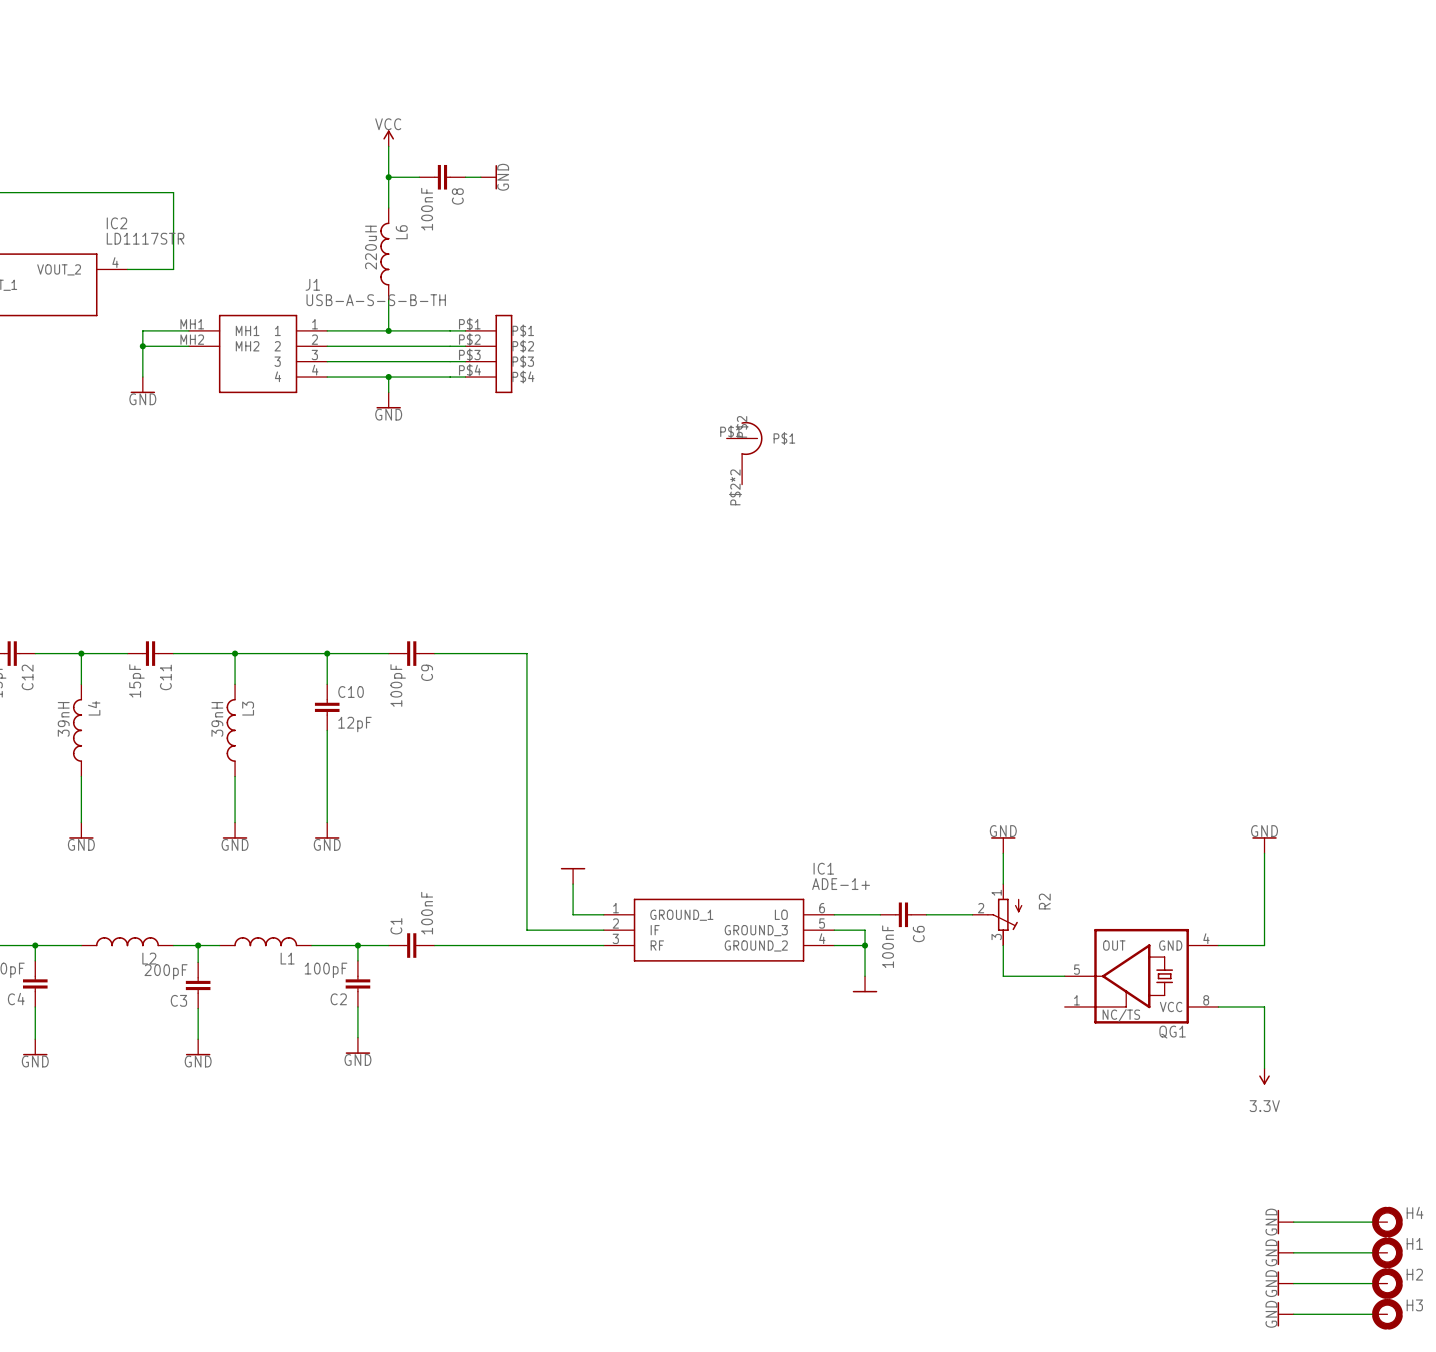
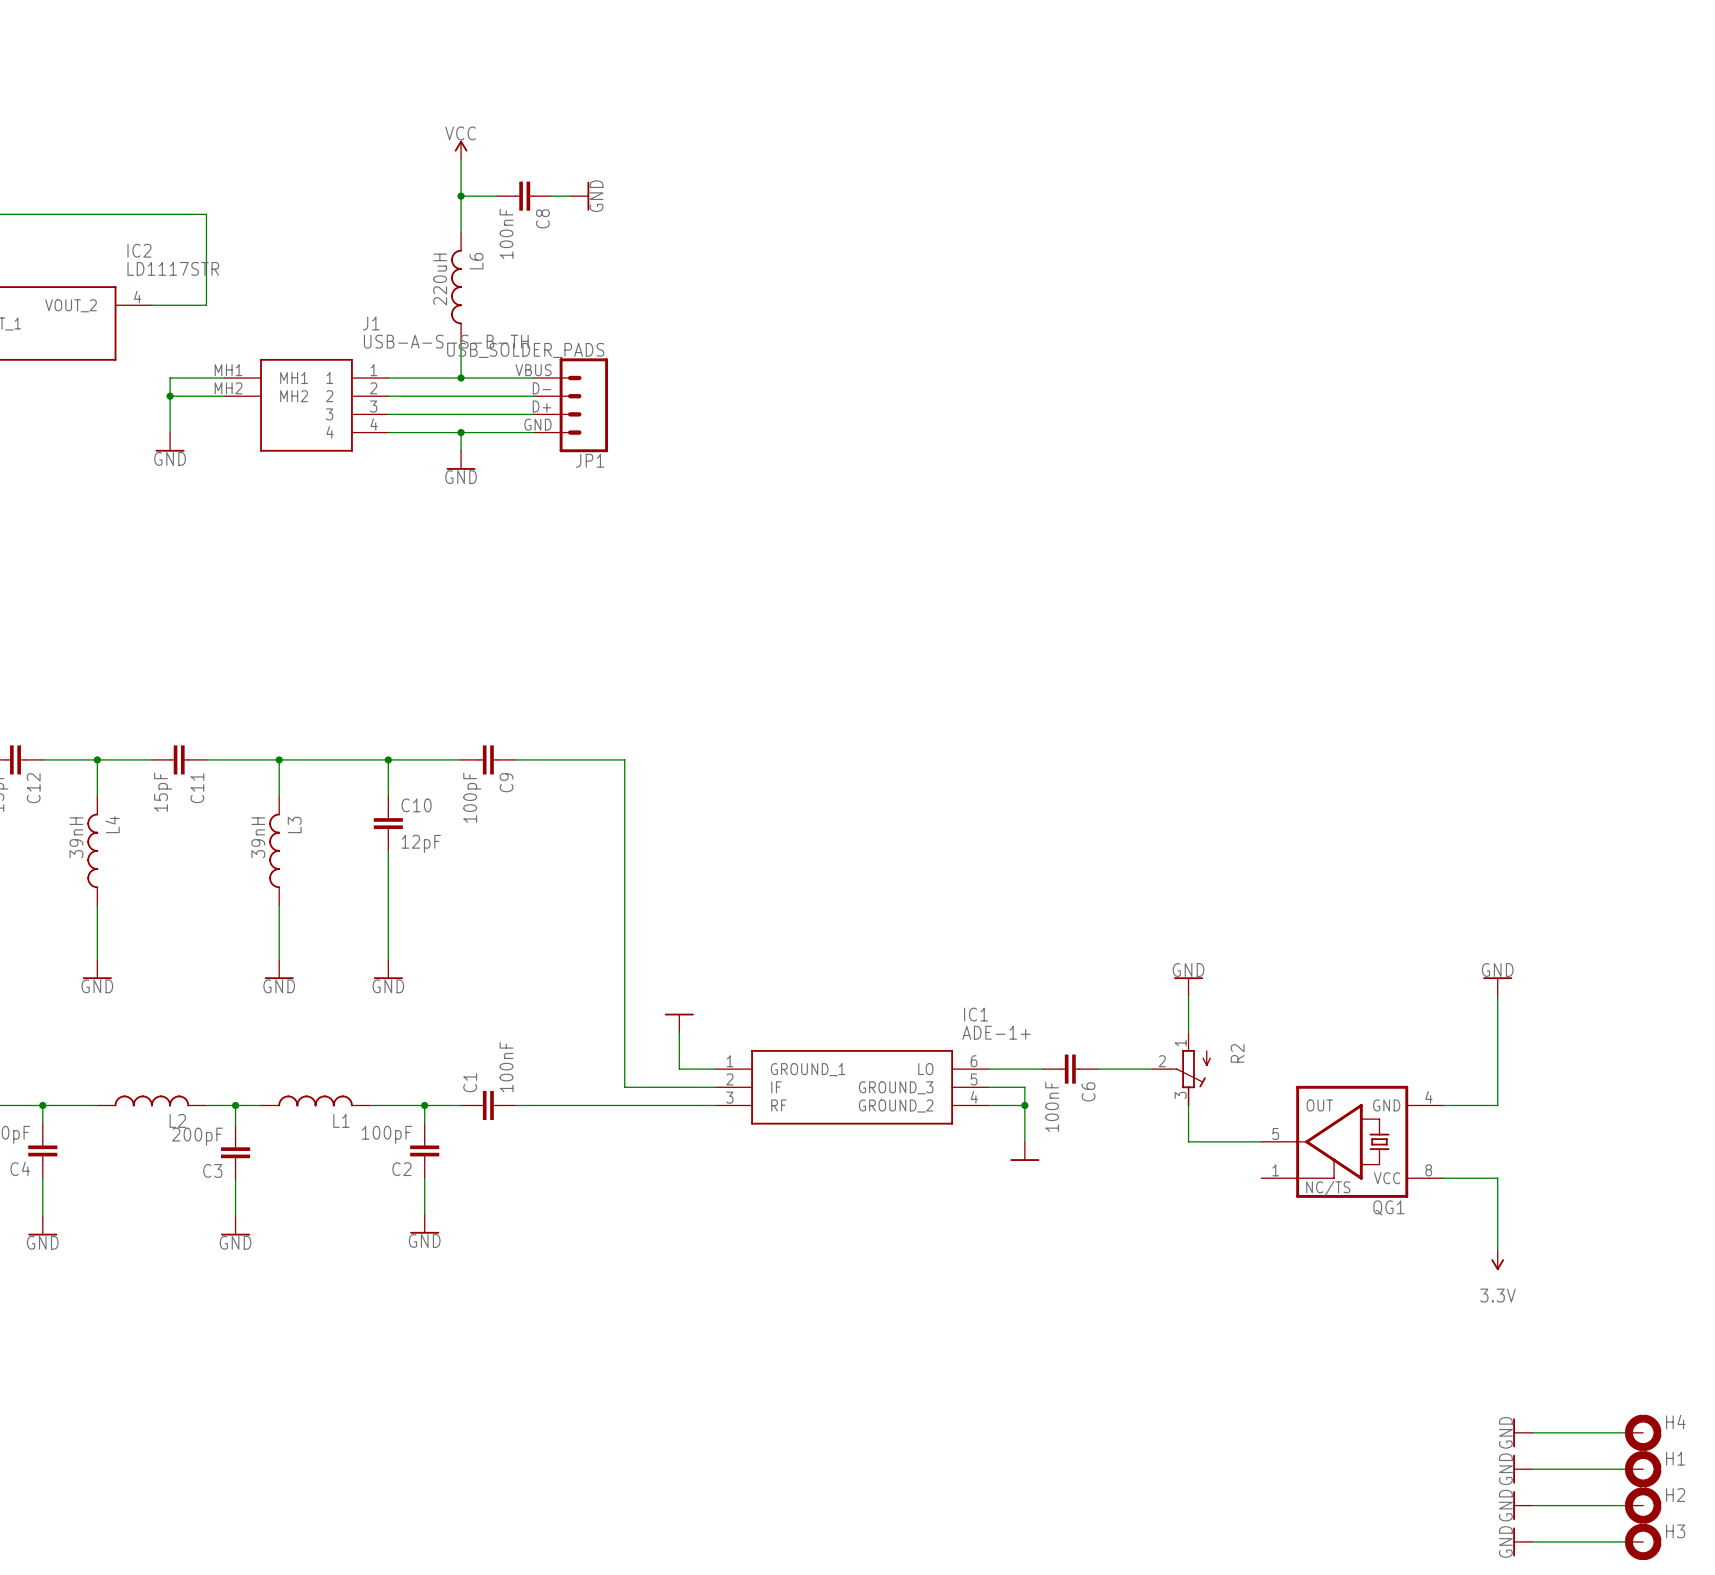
JP1: none -> USB_SOLDER_PADS (570, 405)
part: (488, 353) -> none
part: (744, 453) -> none

